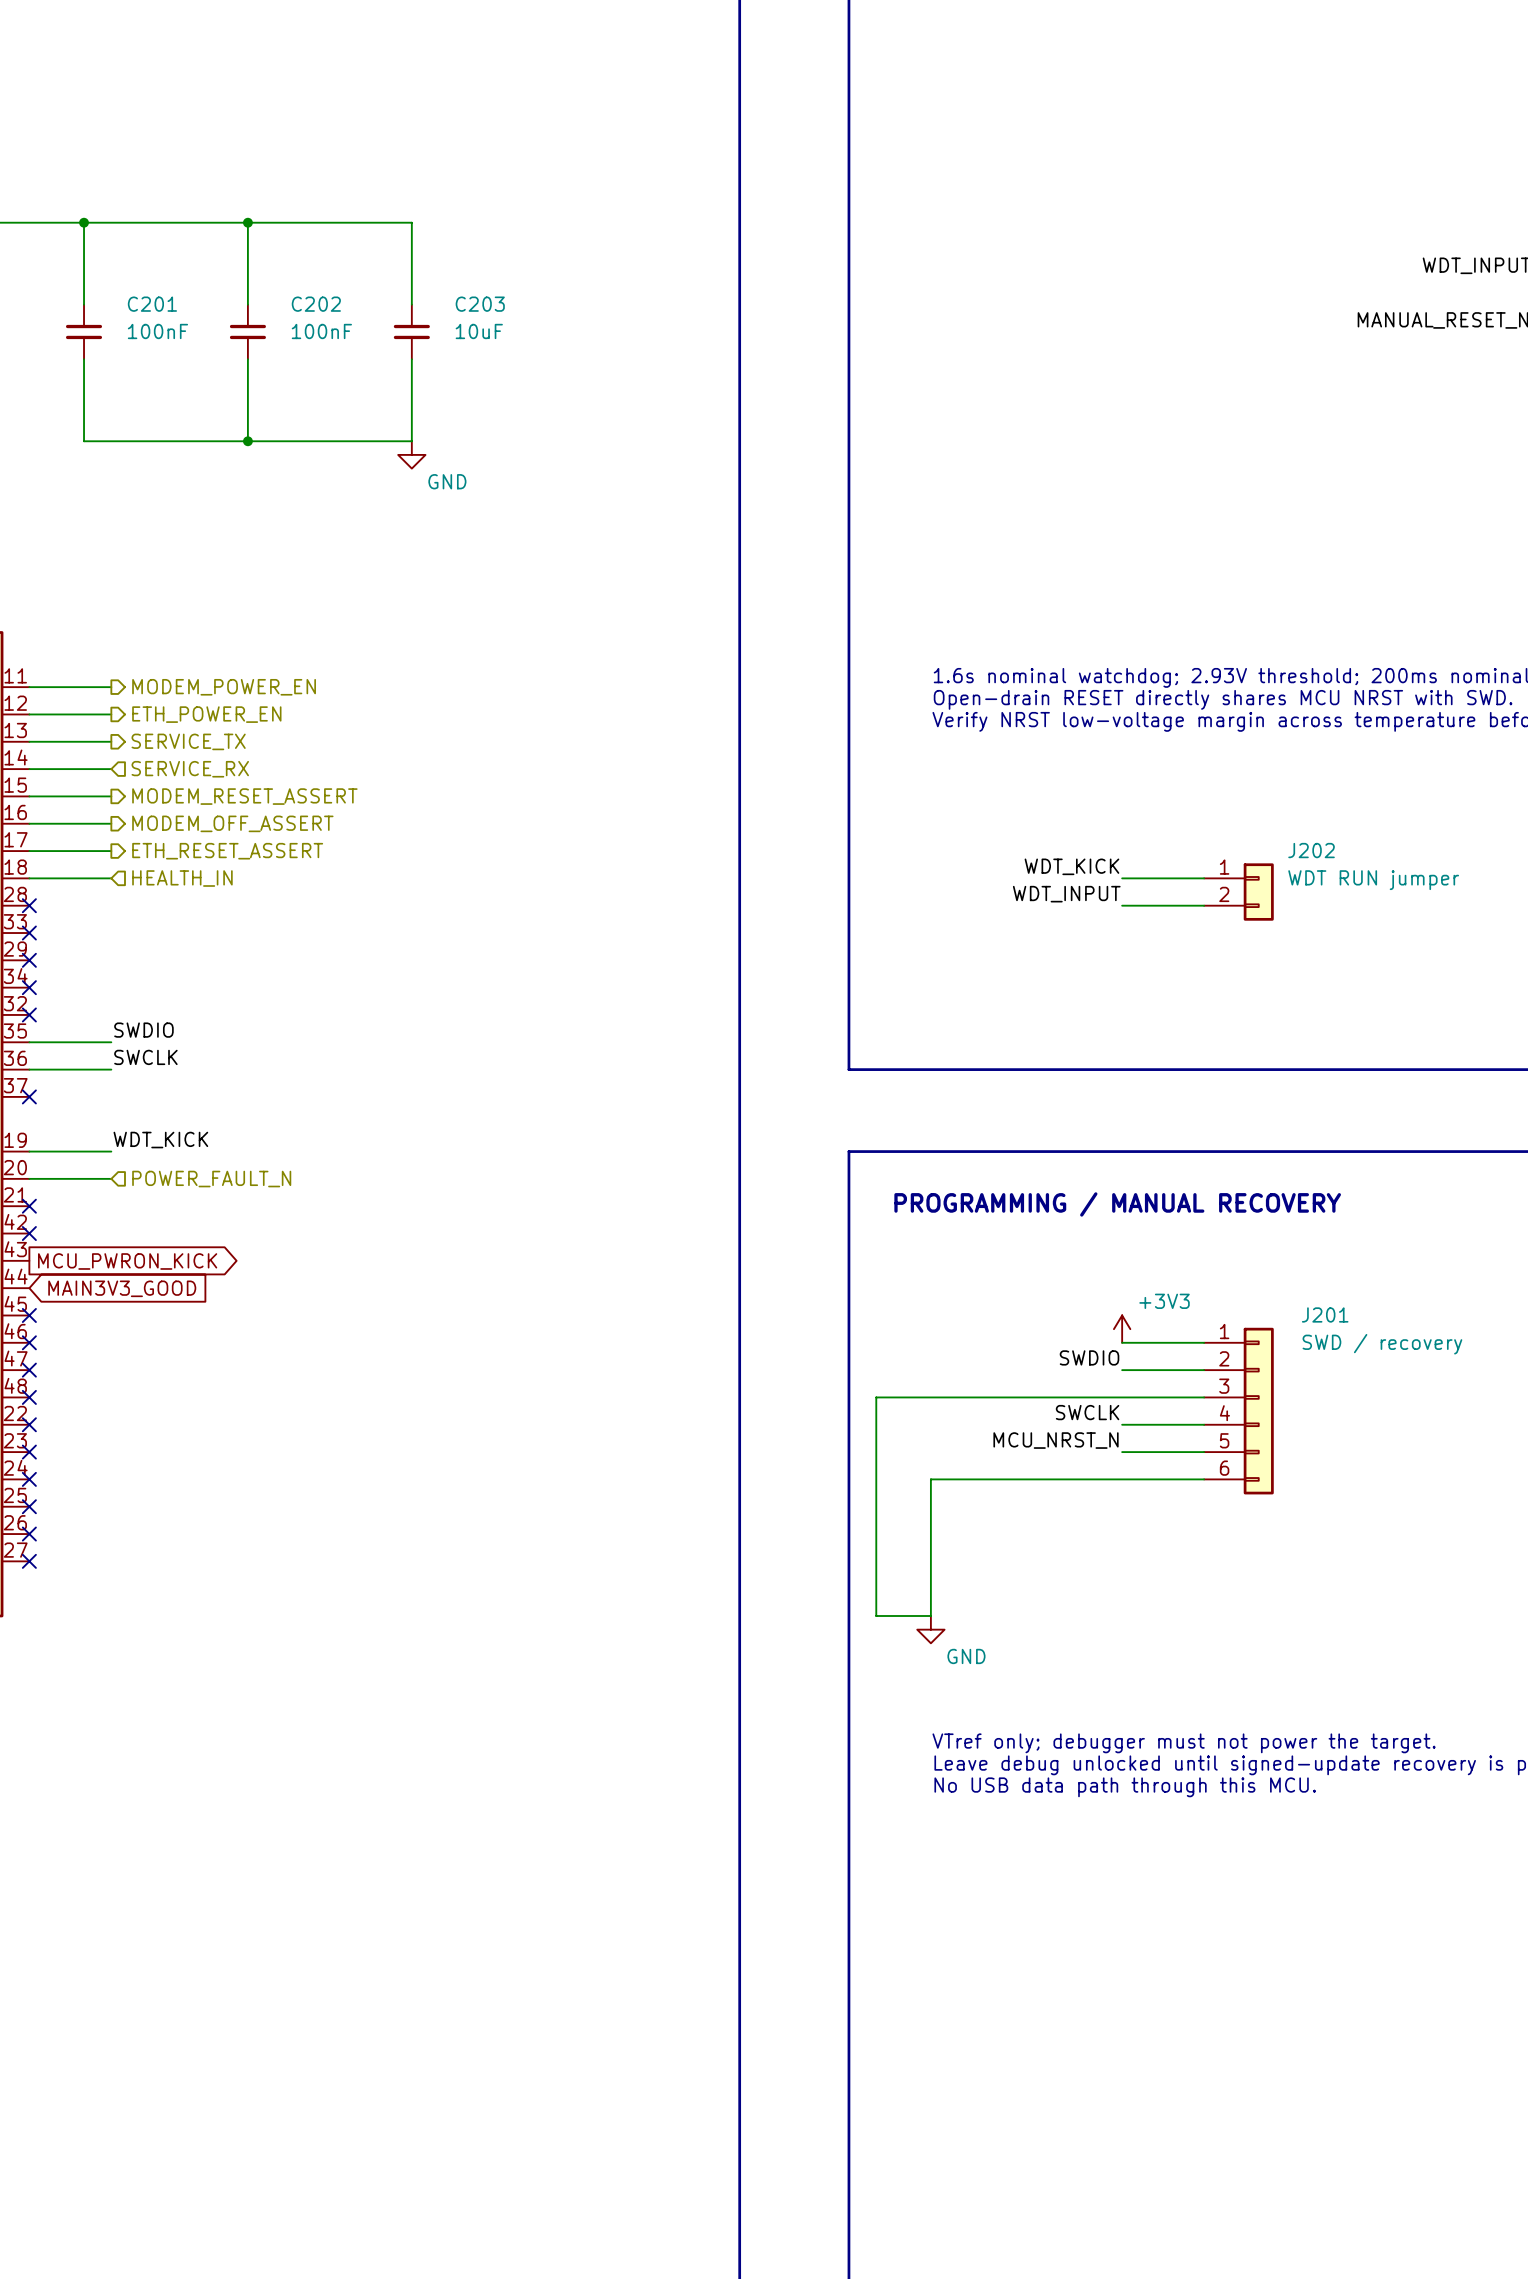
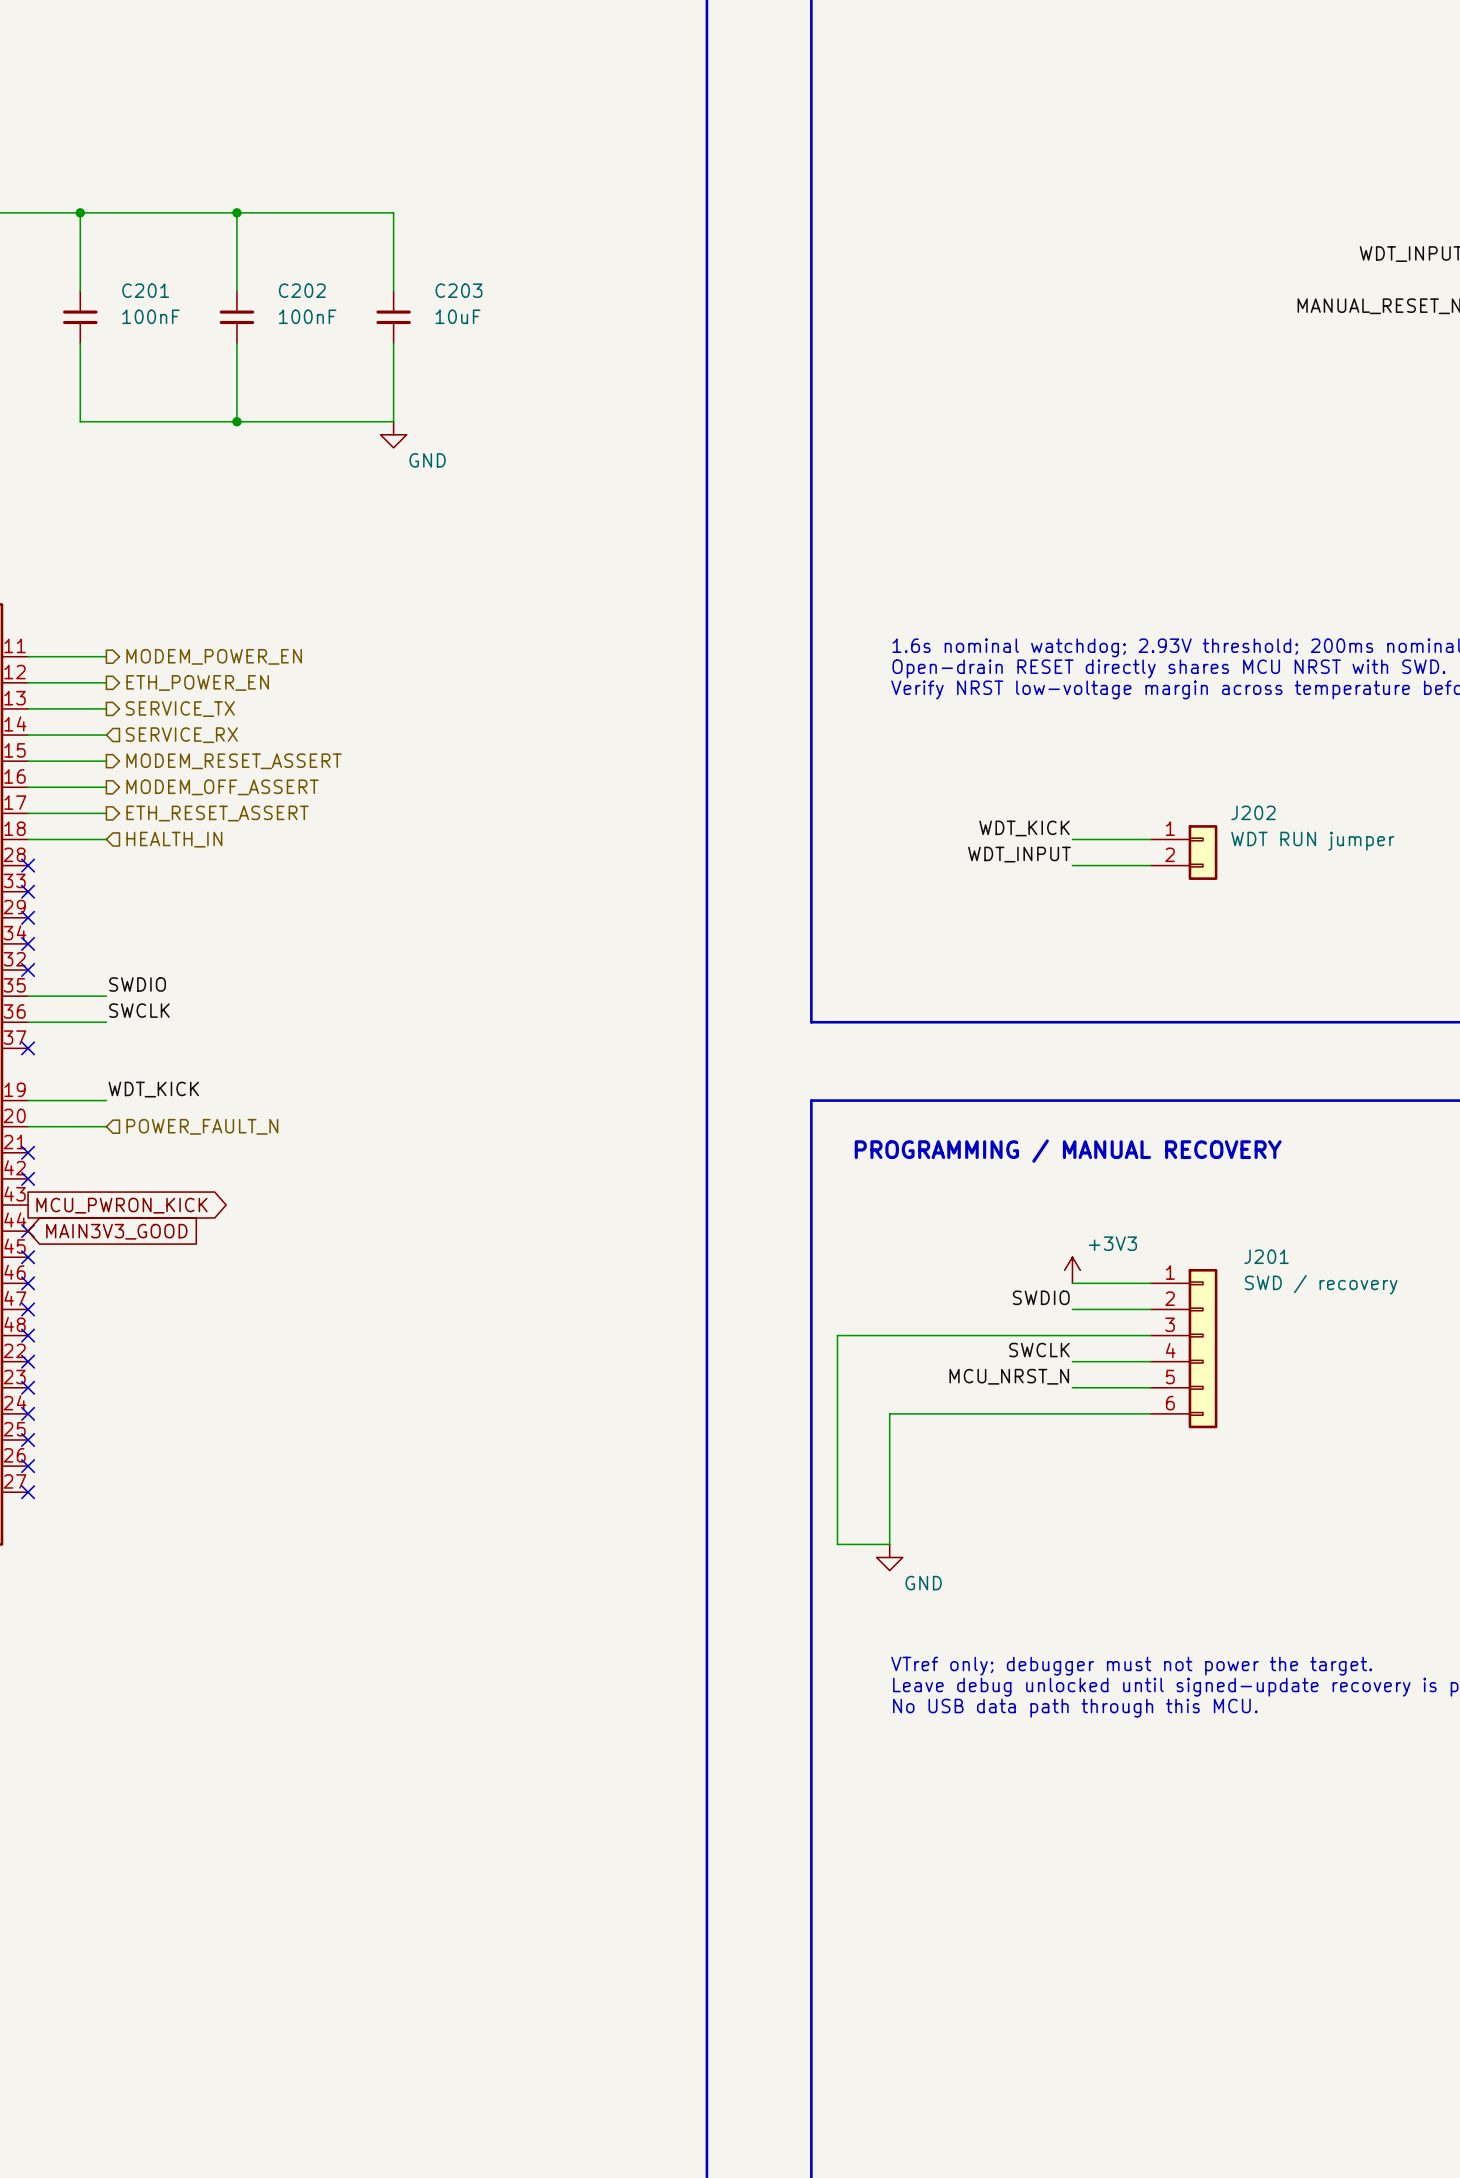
no-connect mark: none -> (28, 1231)

